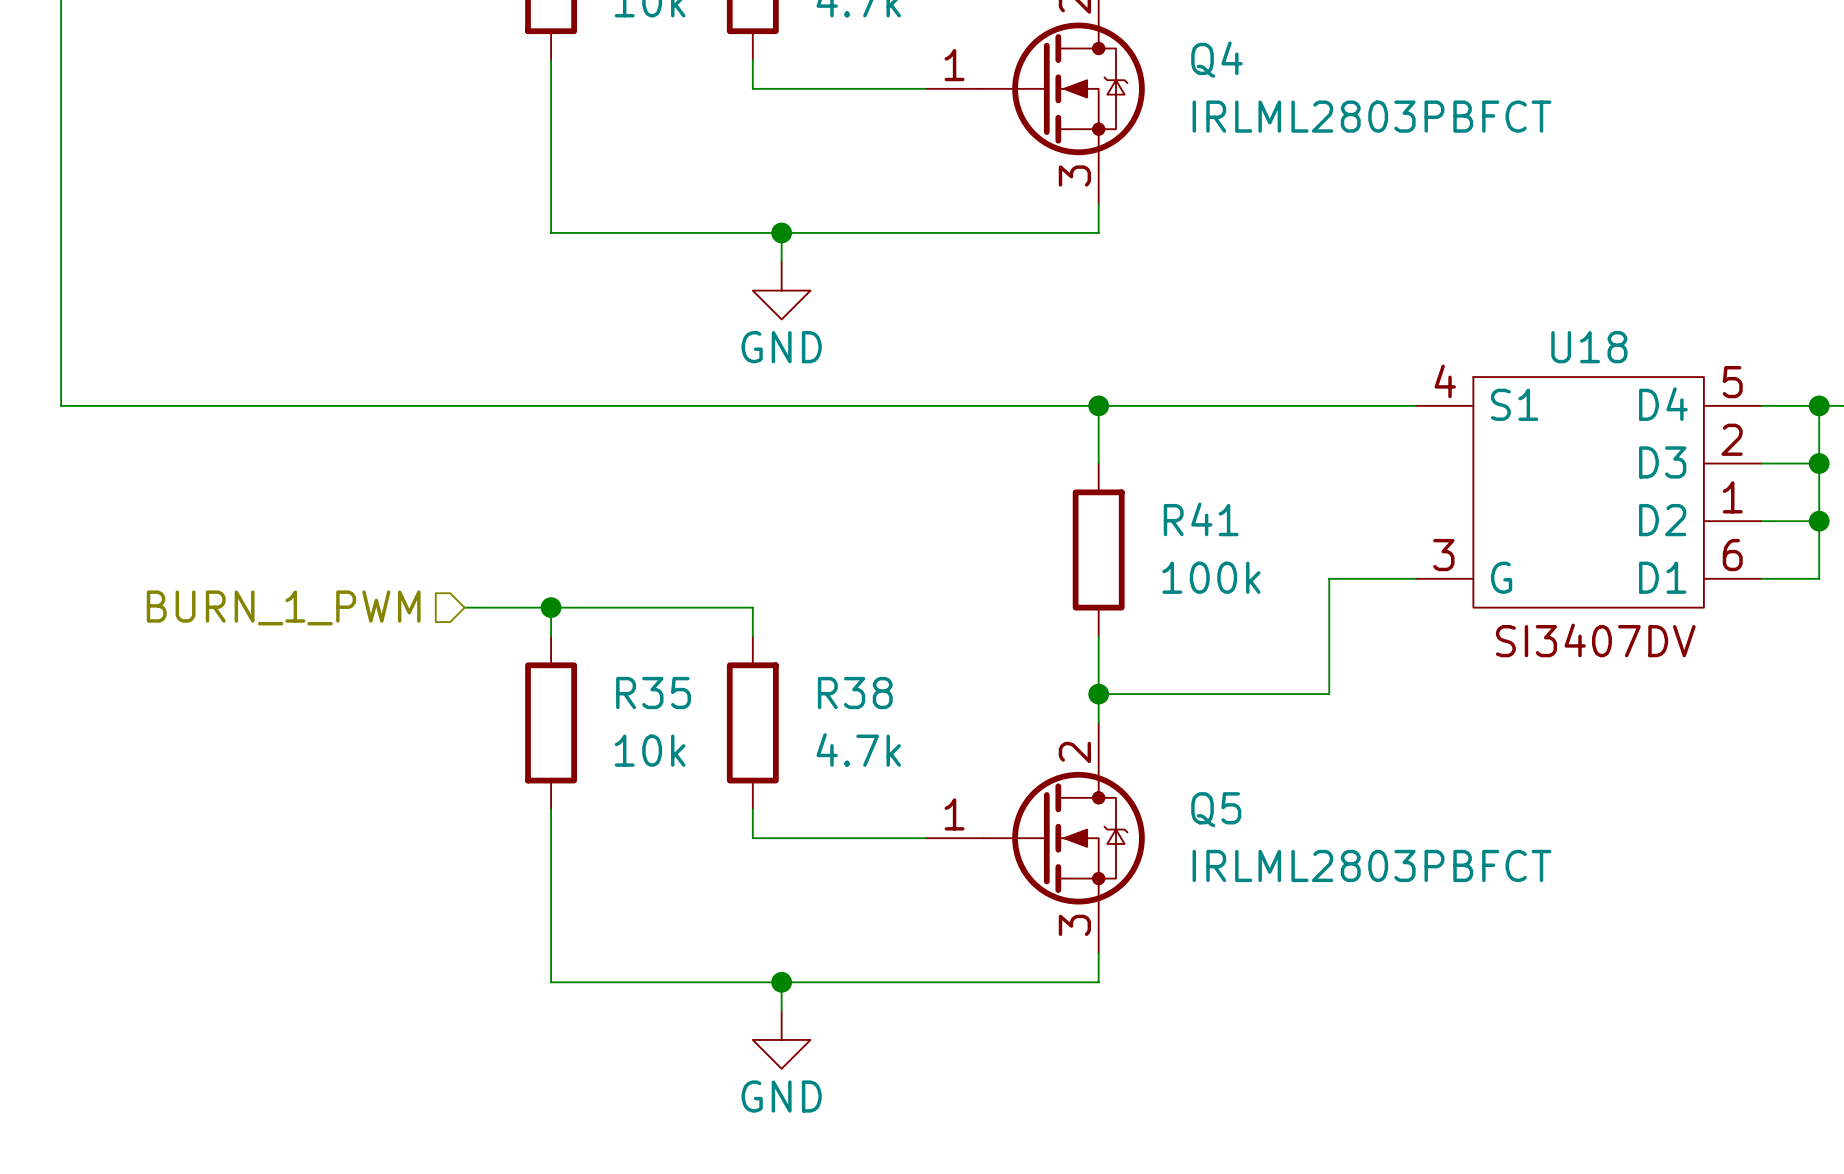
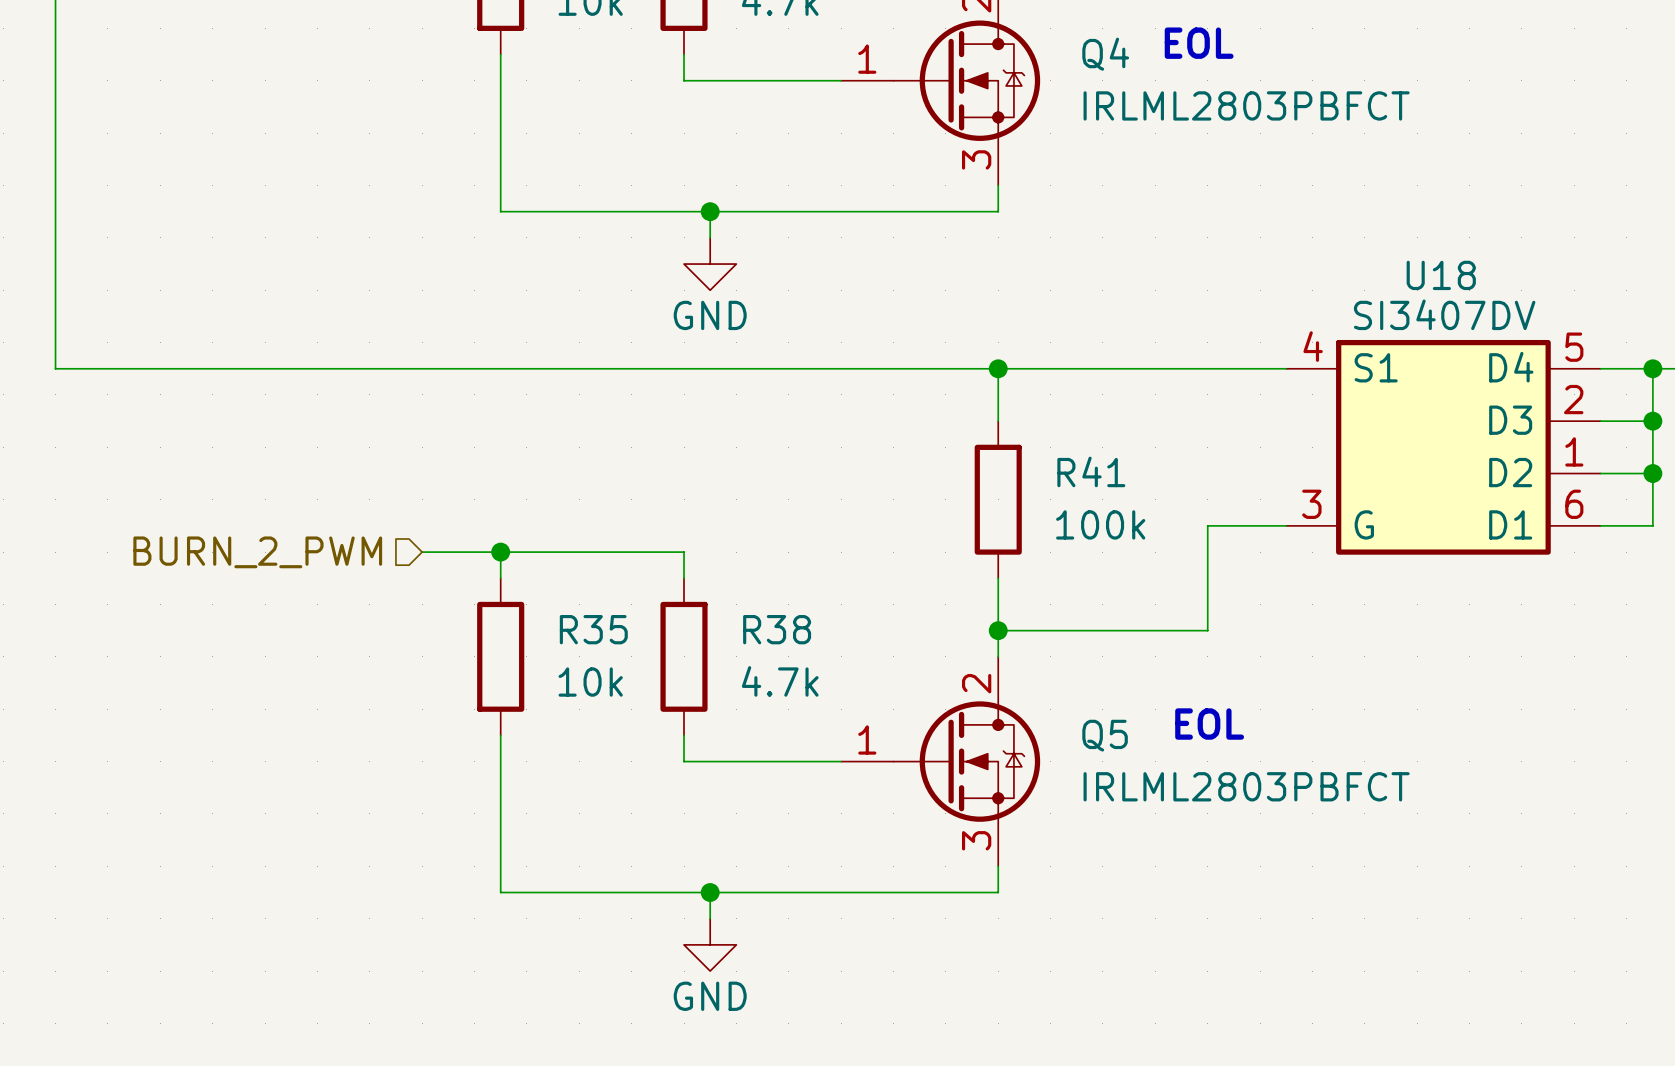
text: none -> EOL (1199, 43)
U18 value: none -> SI3407DV (1444, 314)
U18 symbol: [1415, 377, 1762, 608] -> [1286, 339, 1601, 555]
hierarchical label: BURN_1_PWM (283, 607) -> BURN_2_PWM (257, 552)
text: none -> EOL (1209, 724)

